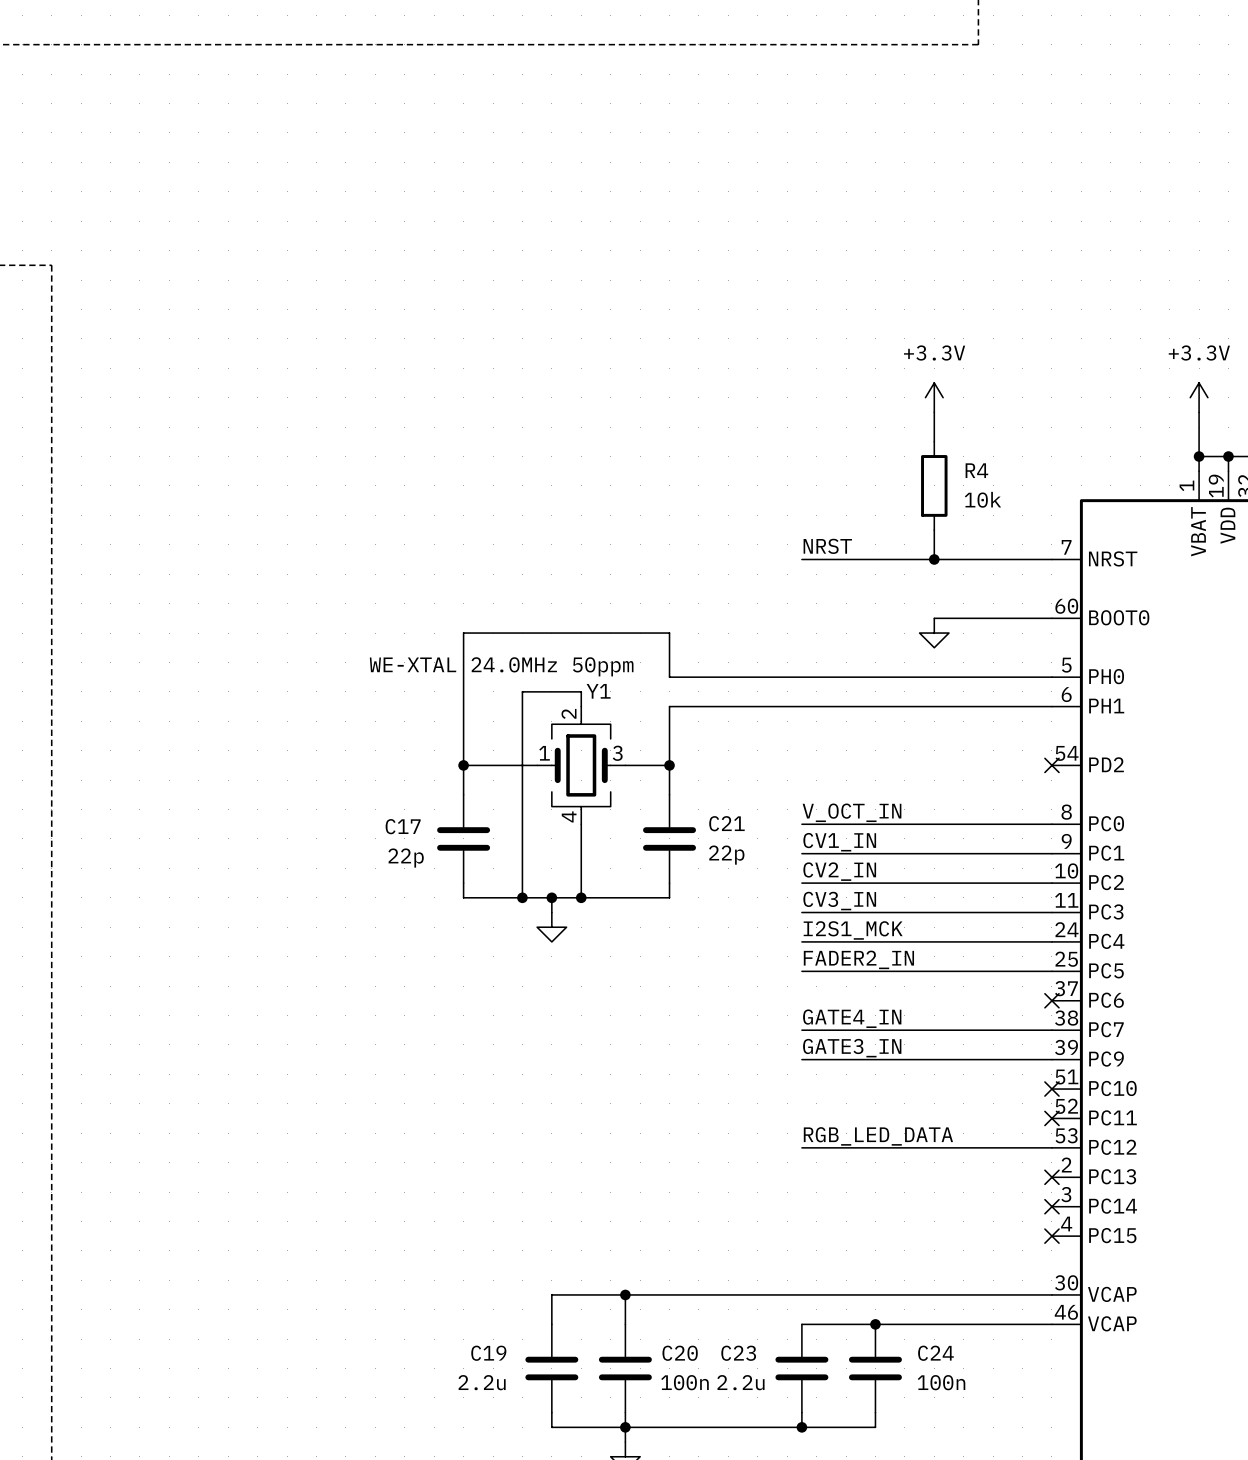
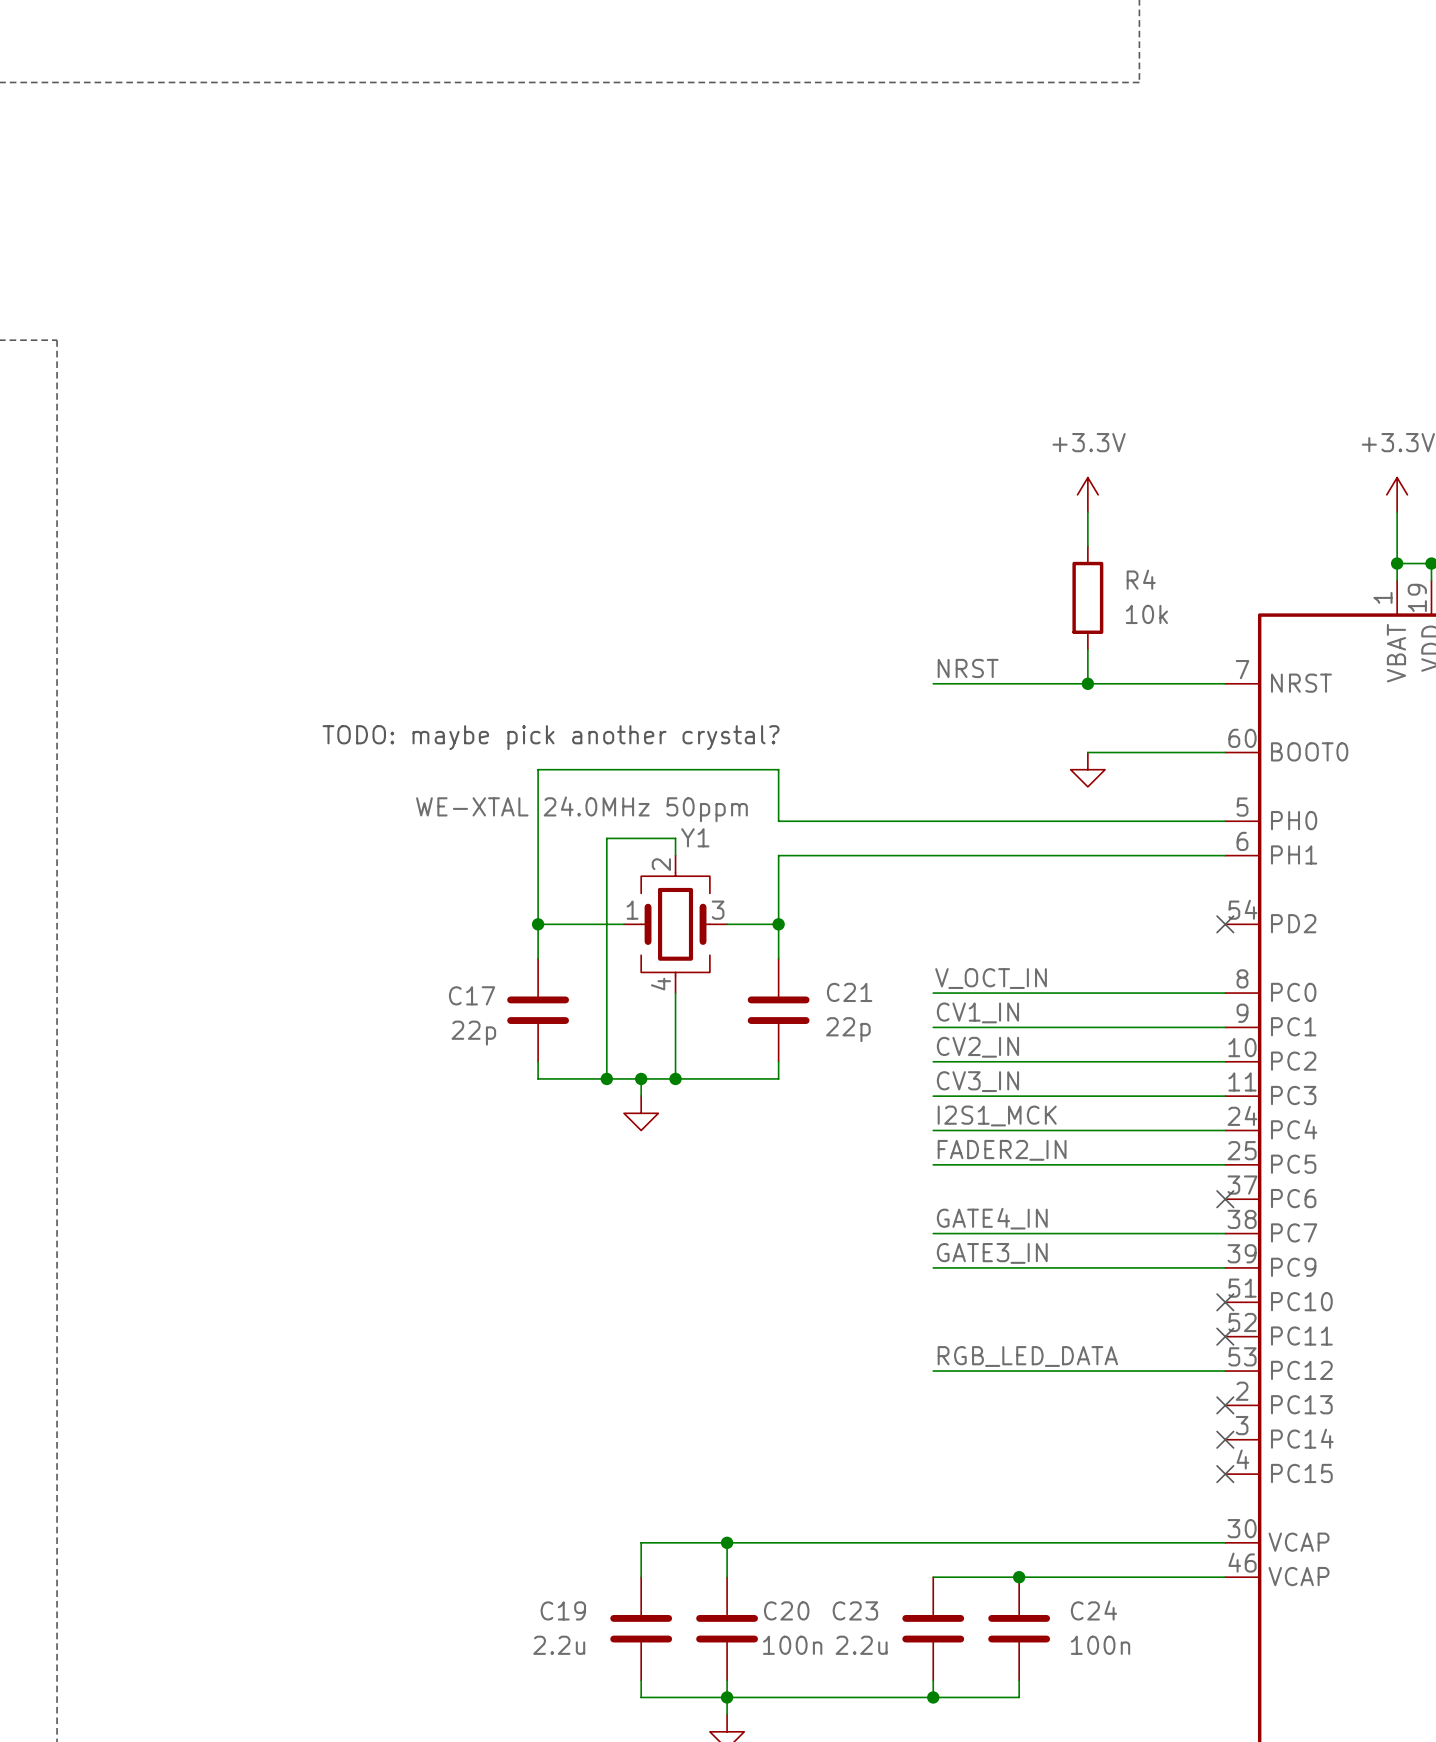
text: none -> TODO: maybe pick another crystal? (551, 737)

